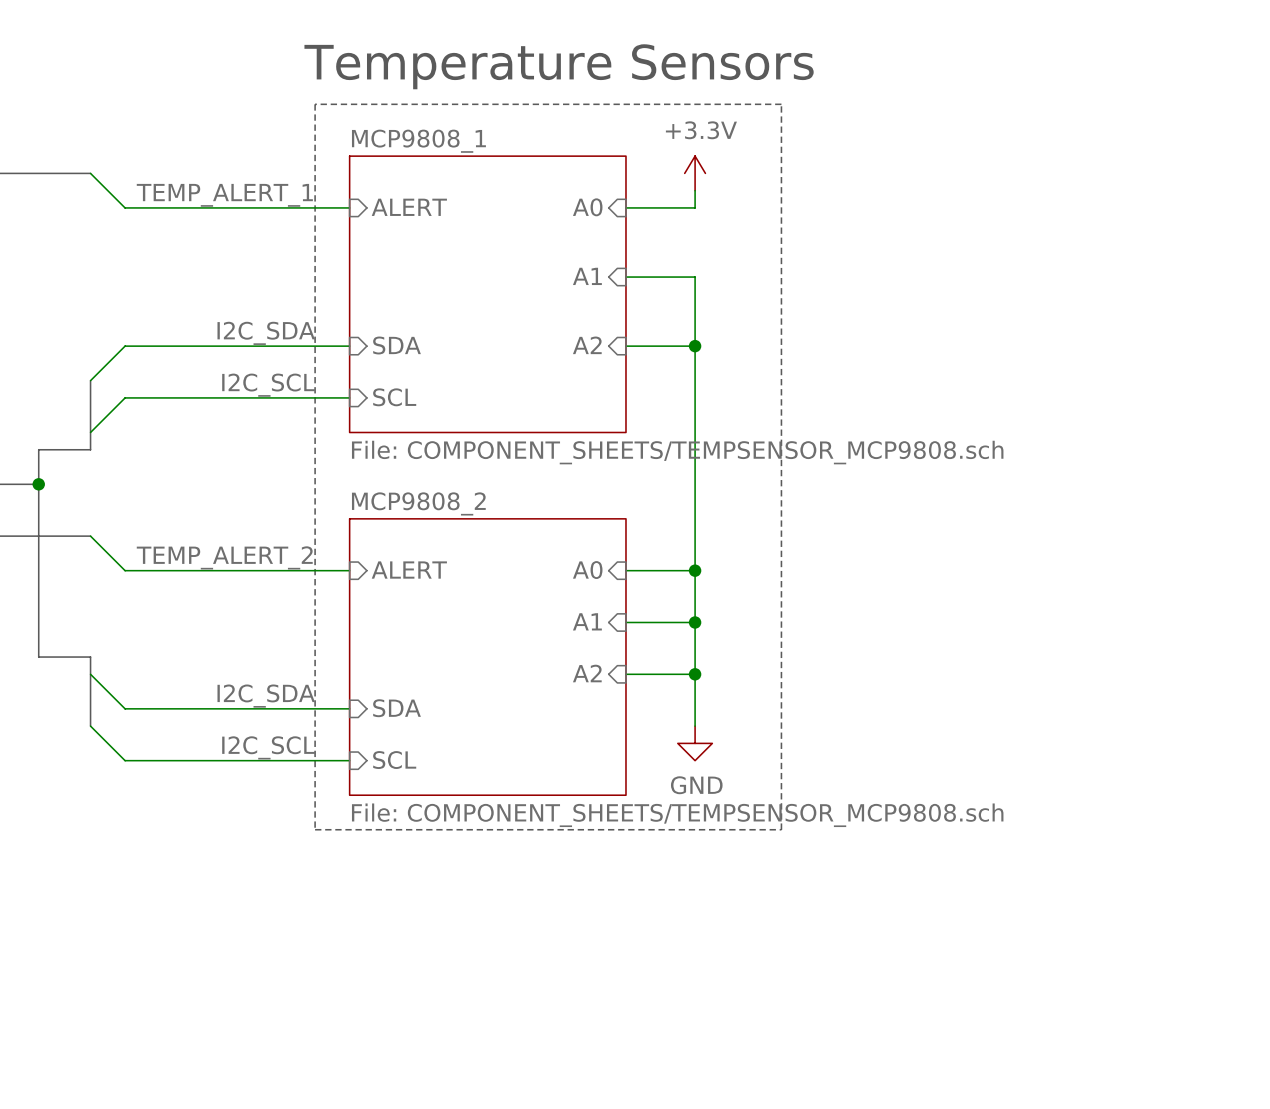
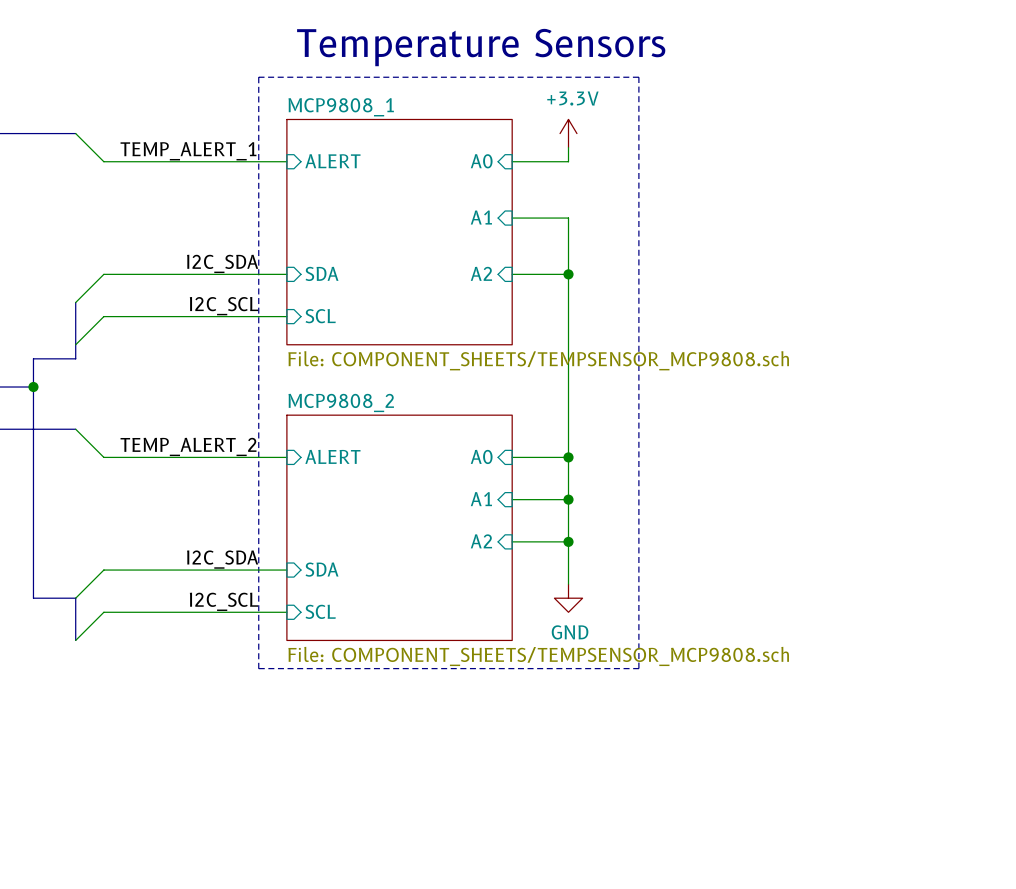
bus: (38, 657) (90, 657) (90, 726) -> (33, 527) (33, 598) (75, 598) (75, 640)
wire: (90, 674) (125, 708) -> (75, 598) (103, 570)
wire: (90, 726) (125, 760) -> (75, 640) (103, 612)

